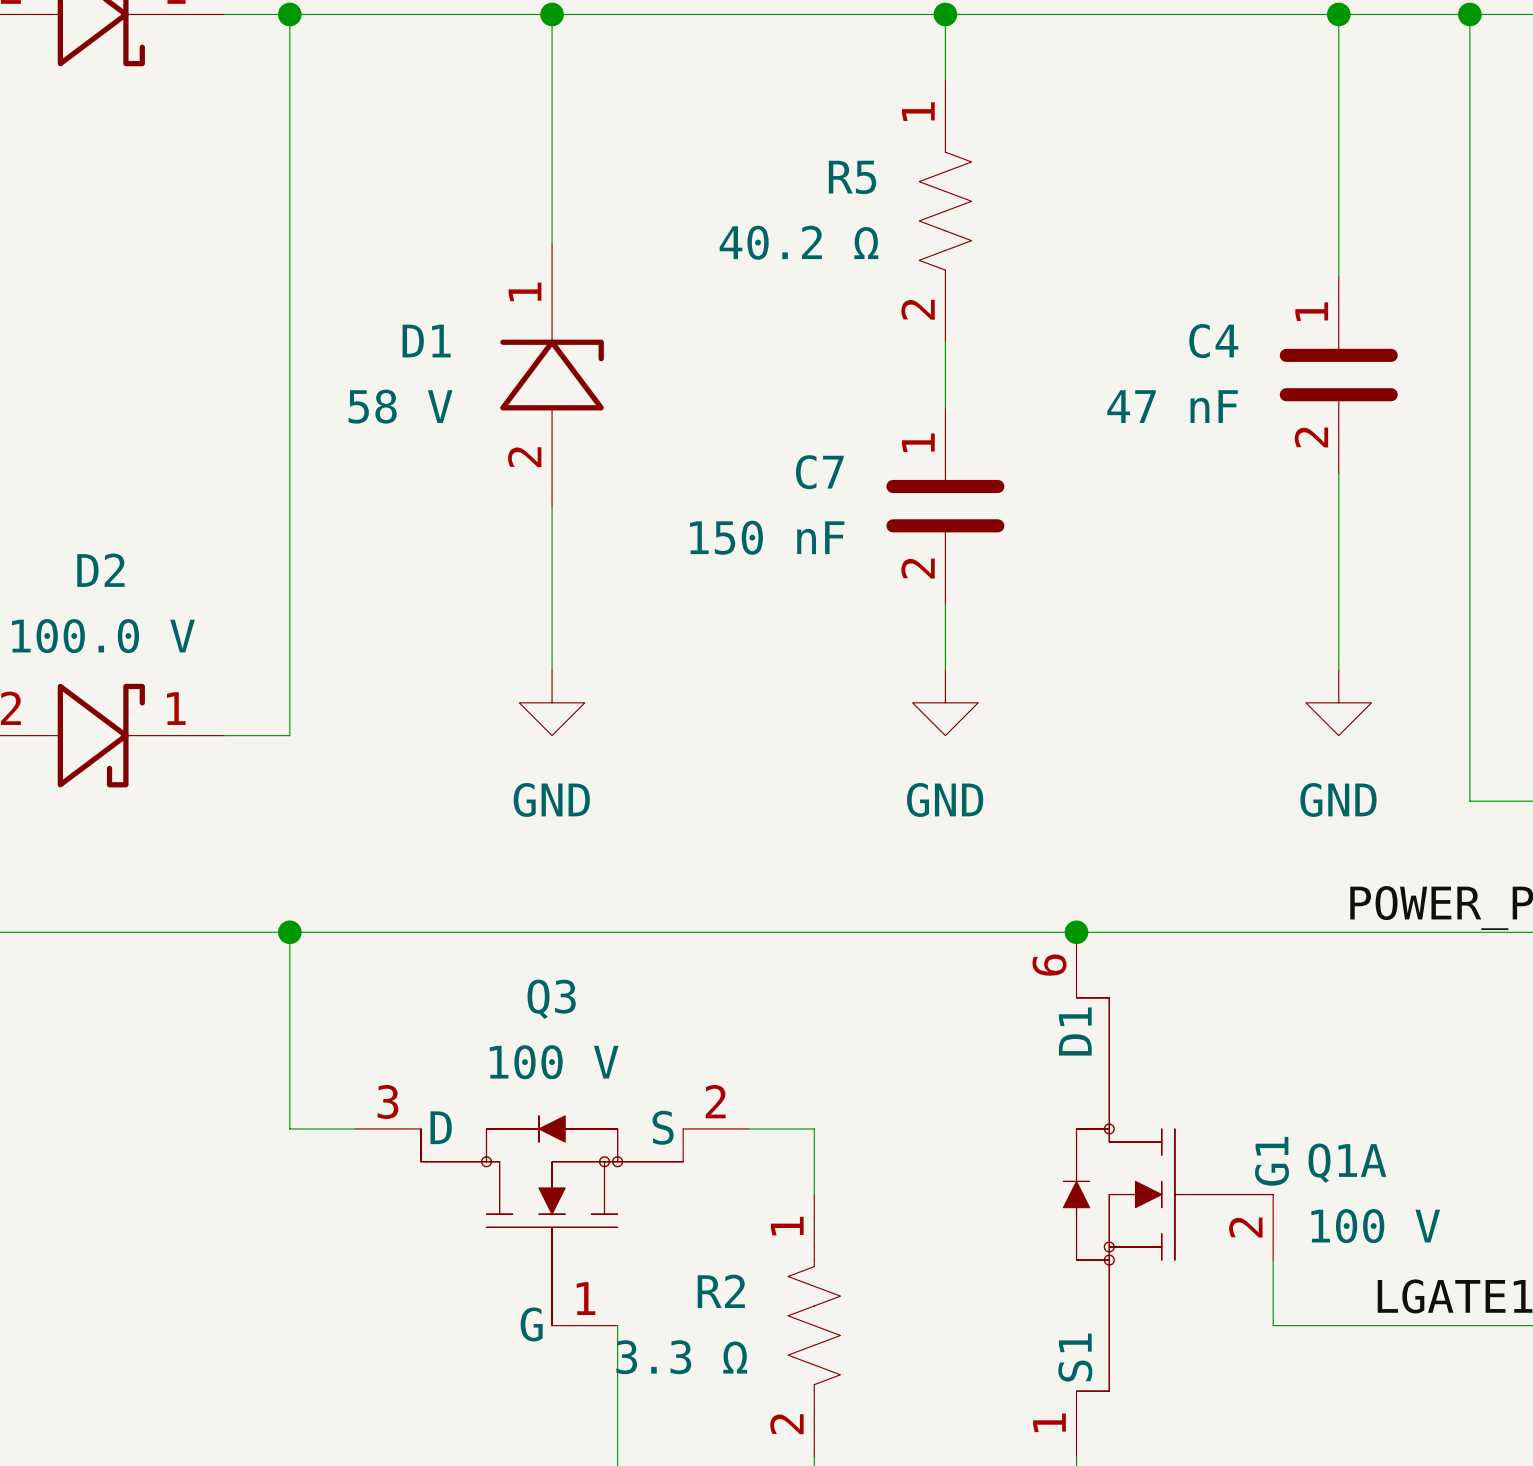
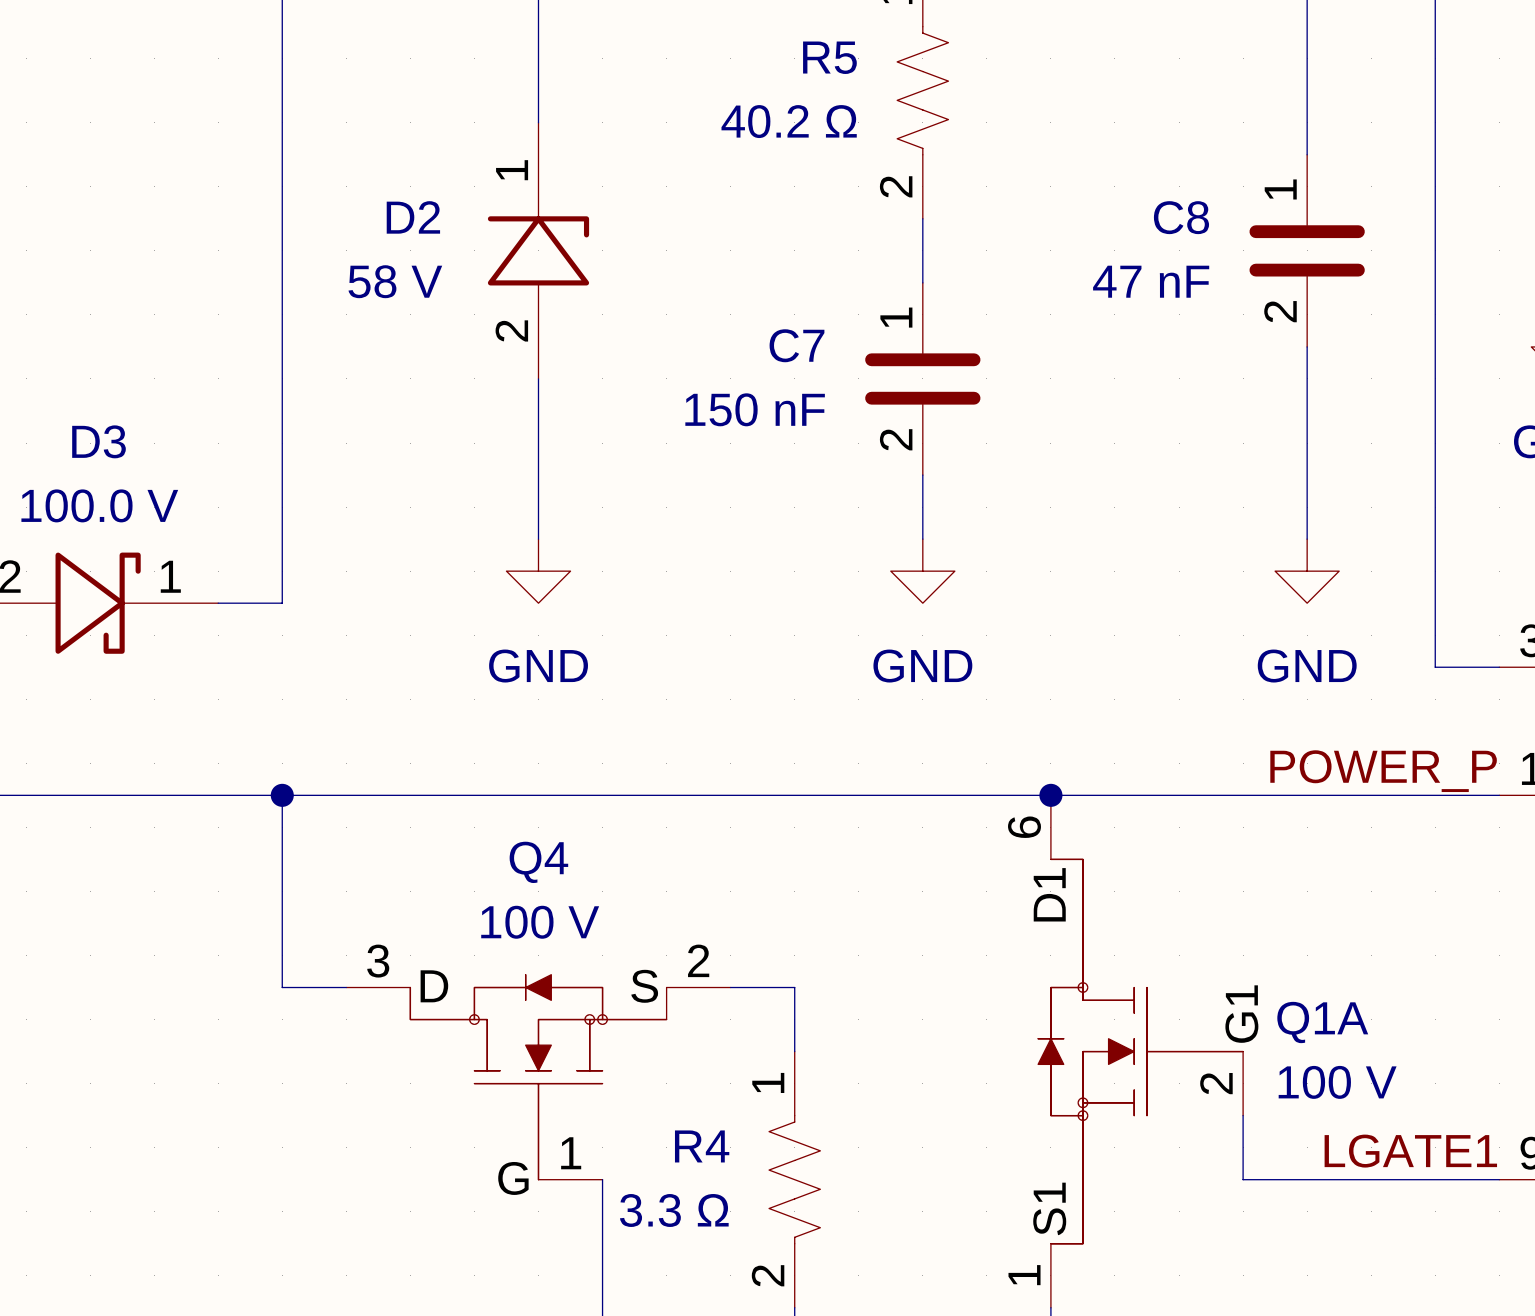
D1 name: D1 (426, 341) -> D2 (413, 217)
C4 name: C4 (1213, 341) -> C8 (1181, 217)
D2 name: D2 (100, 570) -> D3 (99, 441)
Q3 name: Q3 (551, 999) -> Q4 (538, 862)
R2 name: R2 (721, 1291) -> R4 (702, 1146)

